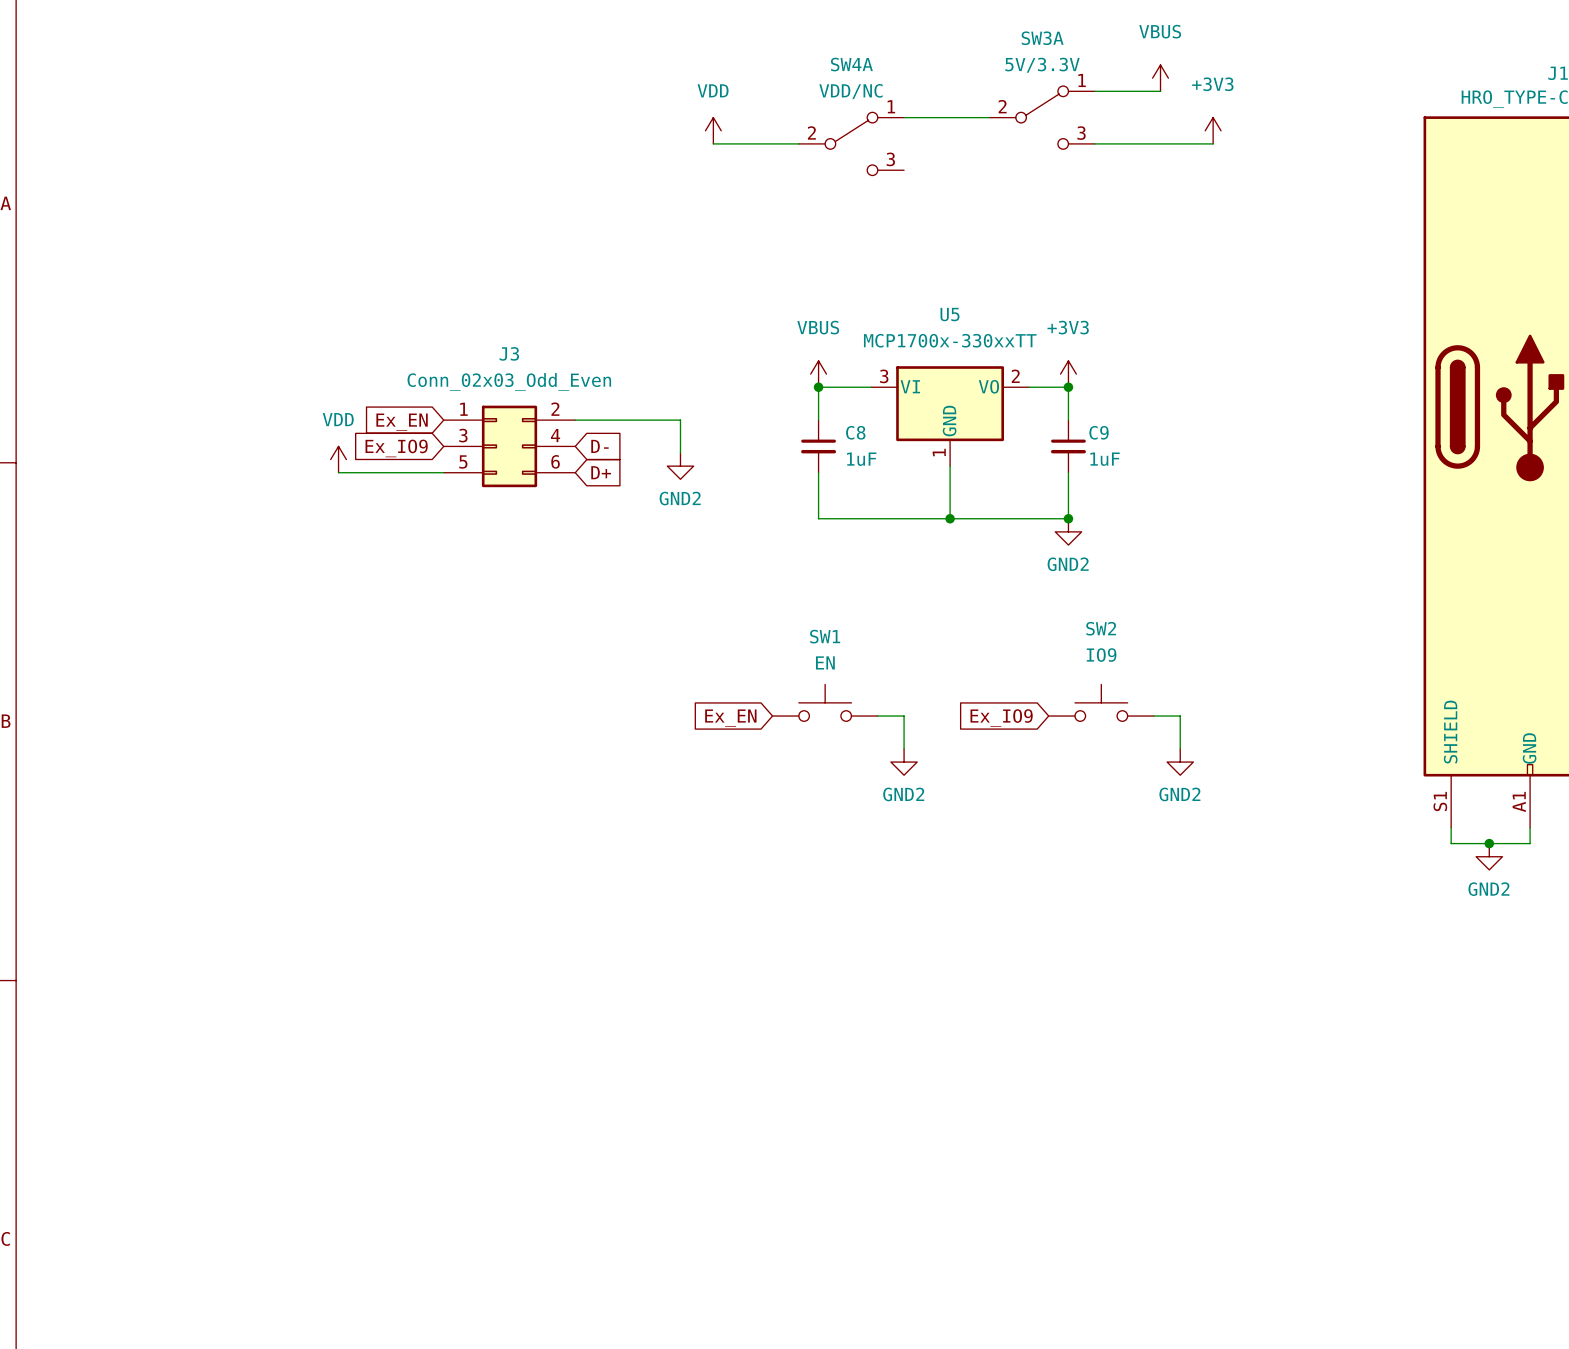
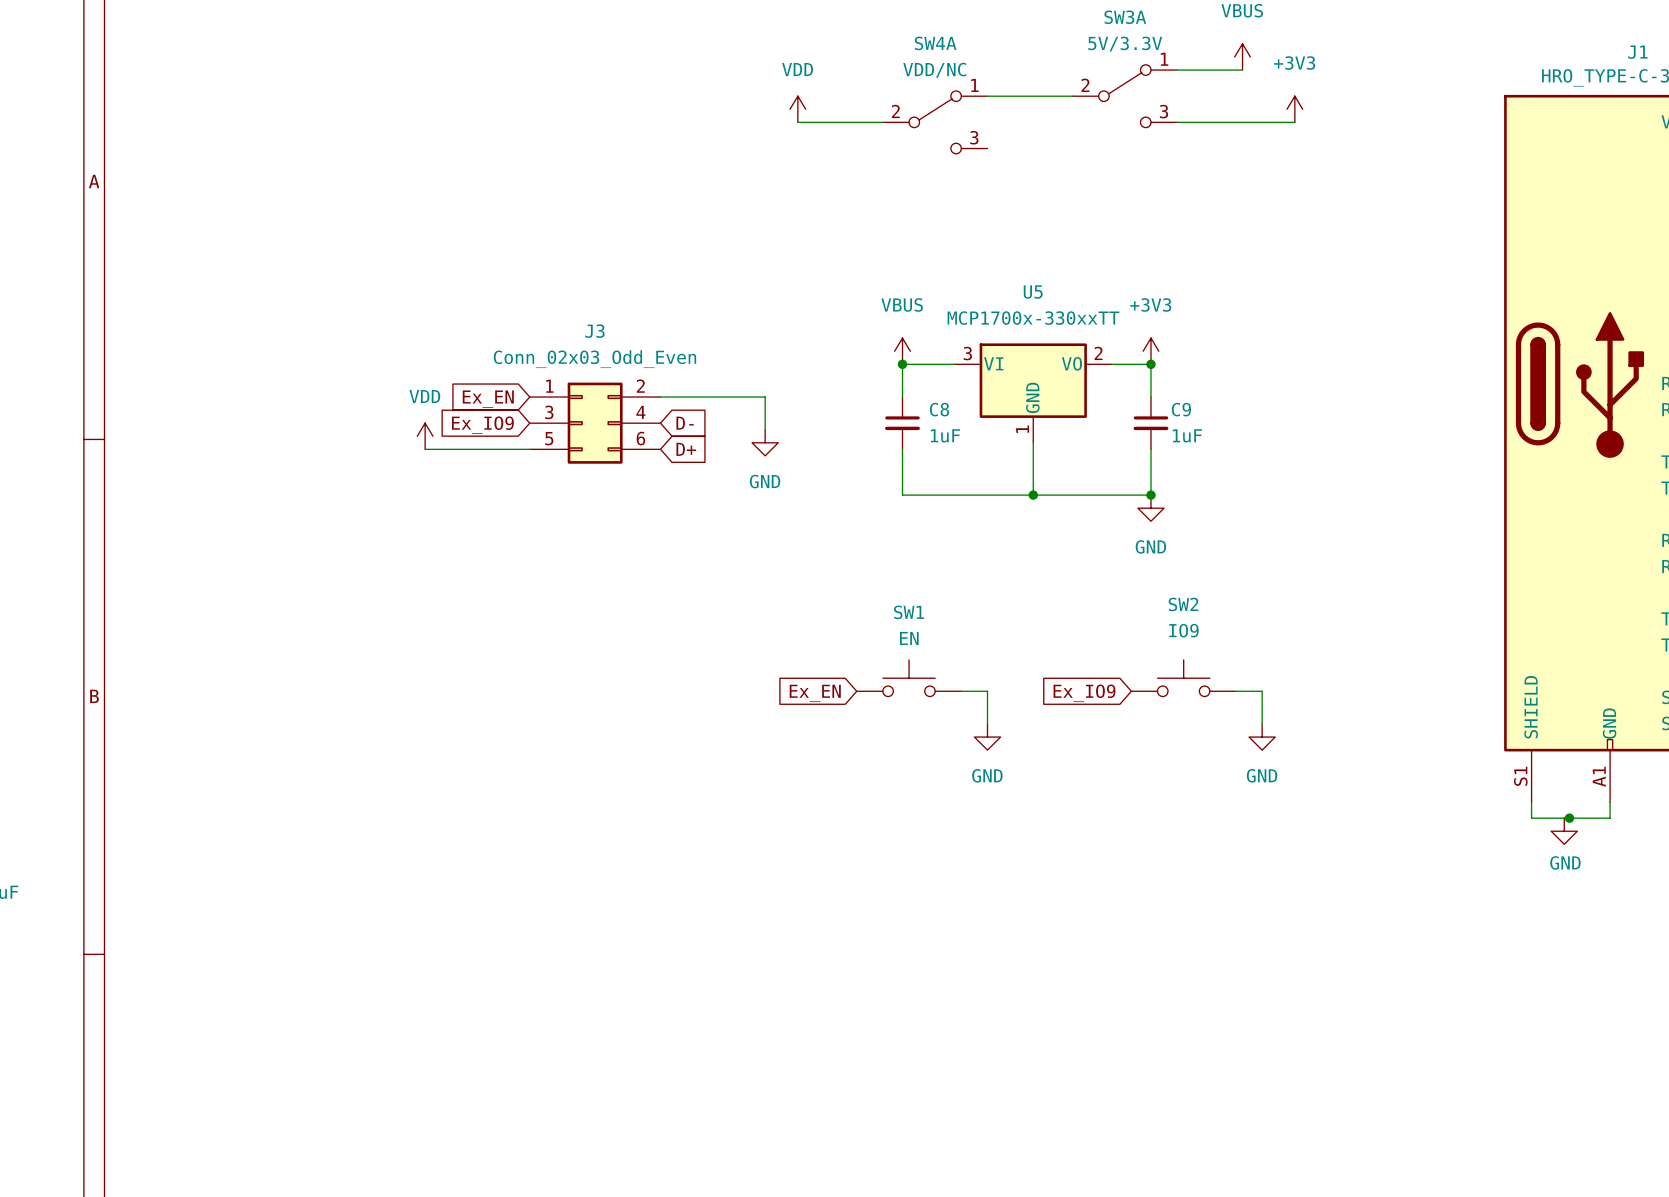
power symbol: GND2 (680, 466) -> GND (765, 442)
power symbol: GND2 (1068, 531) -> GND (1150, 508)
power symbol: GND2 (904, 762) -> GND (987, 737)
power symbol: GND2 (1180, 762) -> GND (1262, 737)
power symbol: GND2 (1489, 856) -> GND (1564, 831)

